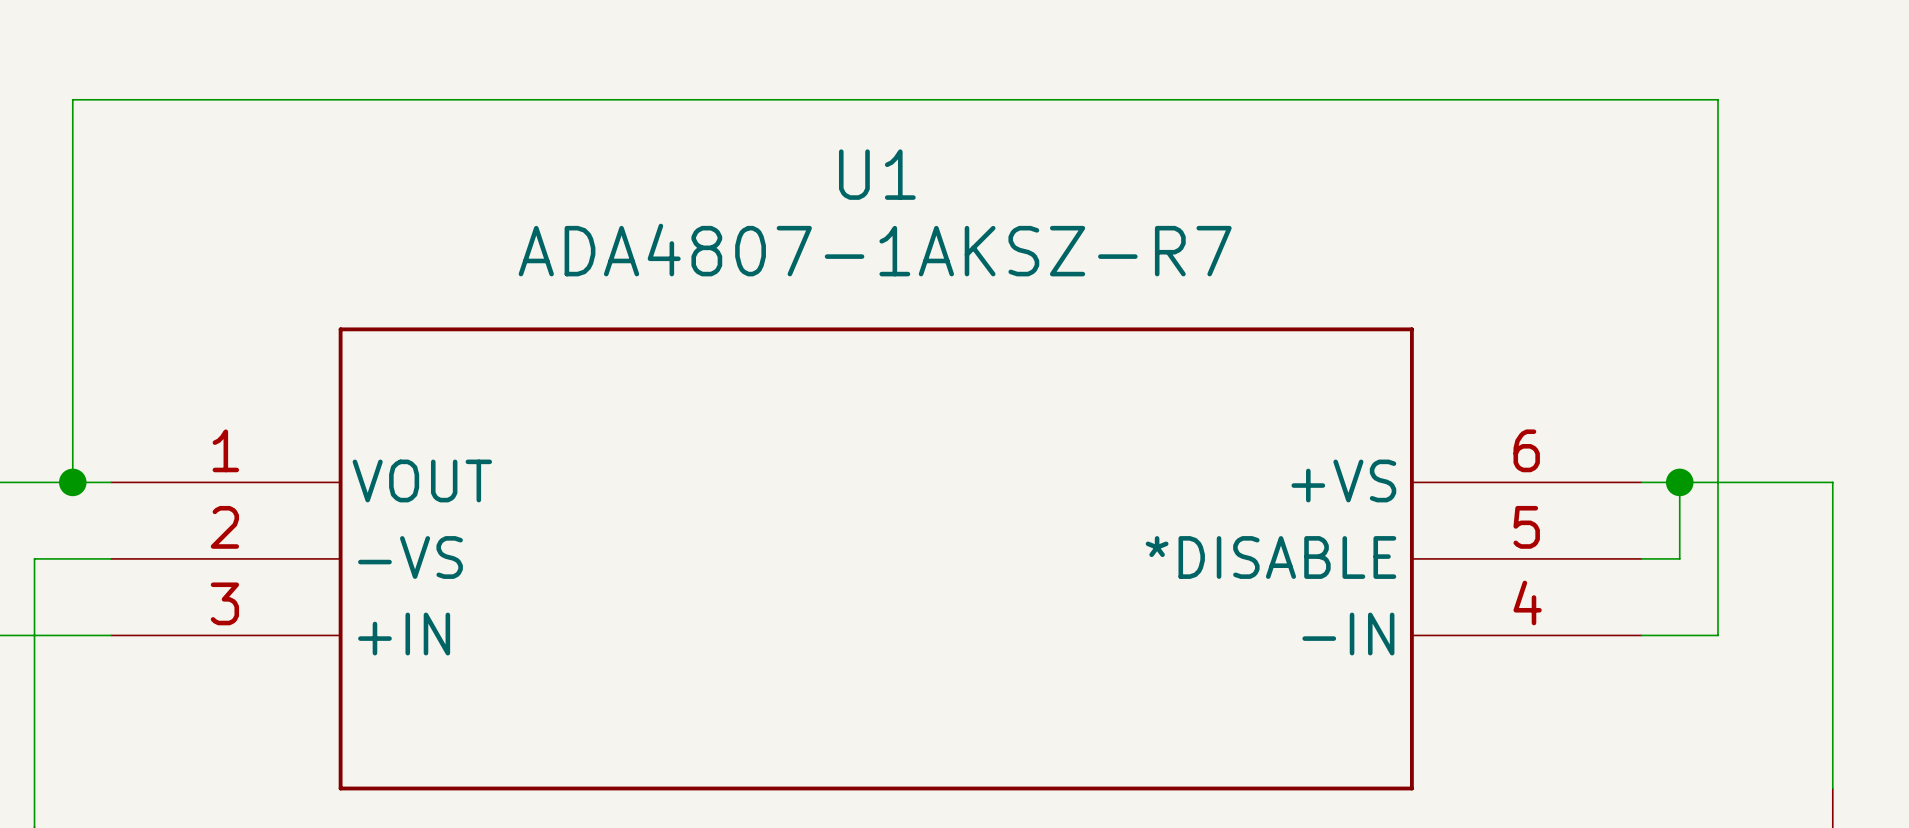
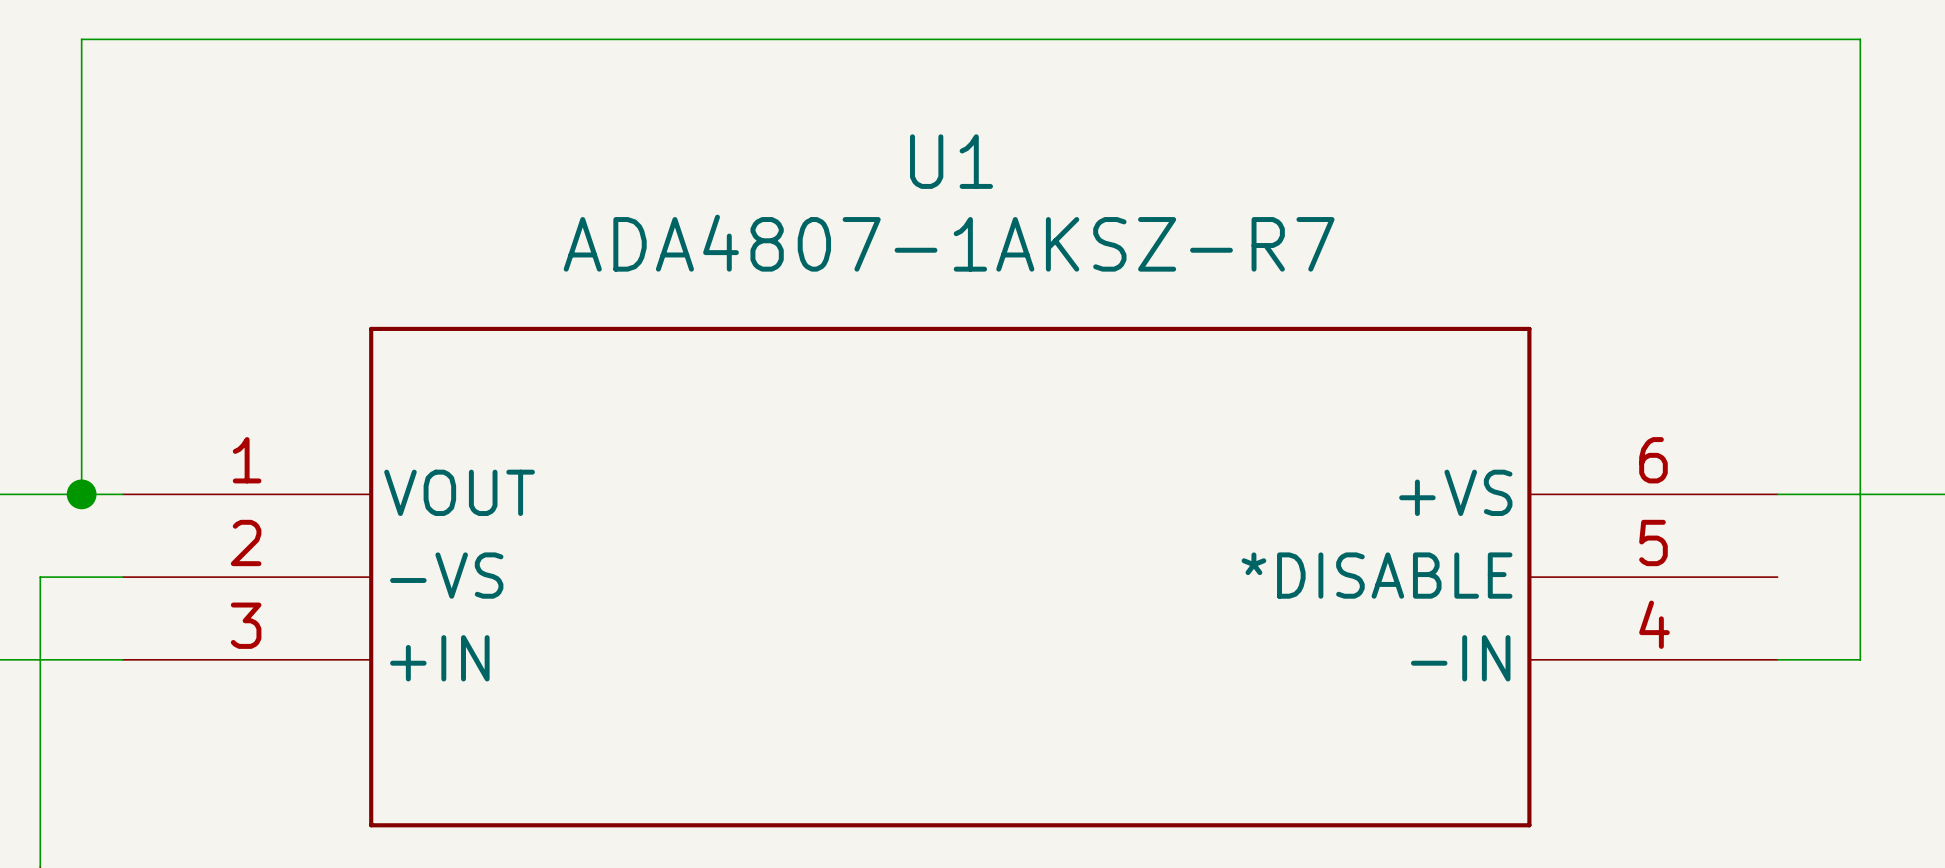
wire: (72, 99) (1718, 99) -> (81, 80) (81, 39) (1860, 39) (1860, 80)
wire: (1679, 482) (1679, 558) (1641, 558) -> none
junction: (1679, 482) -> none

